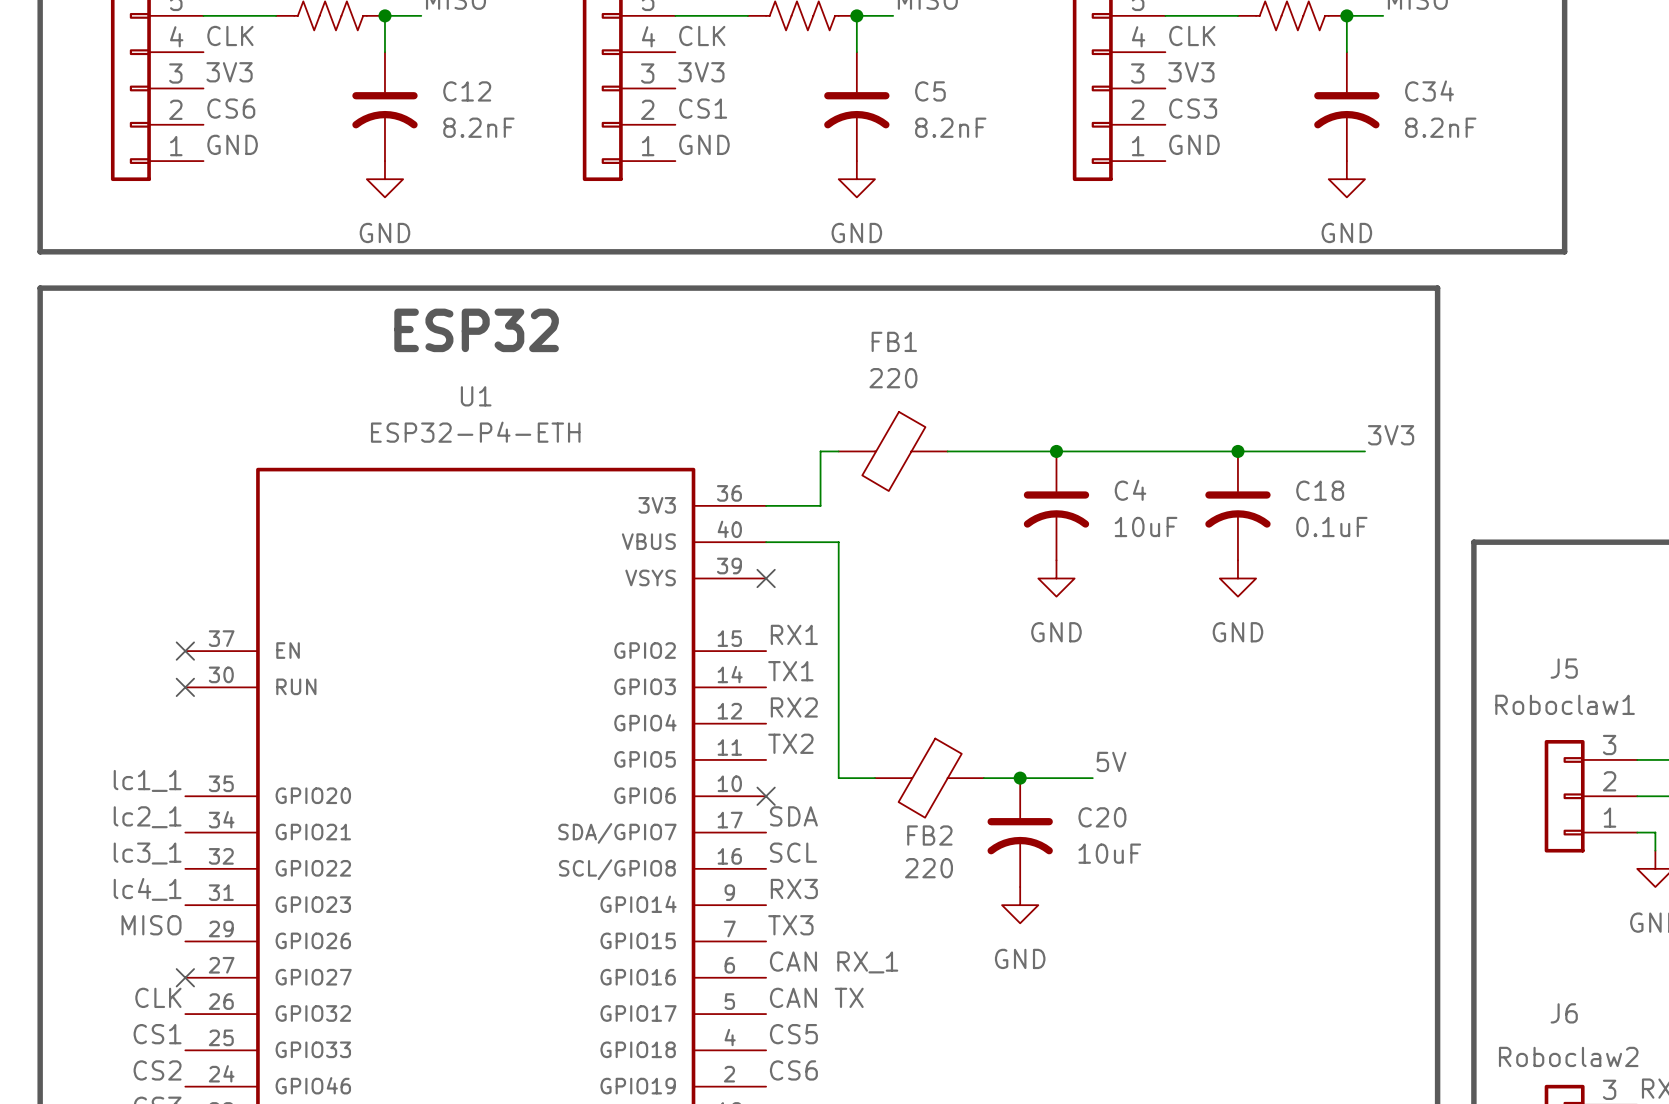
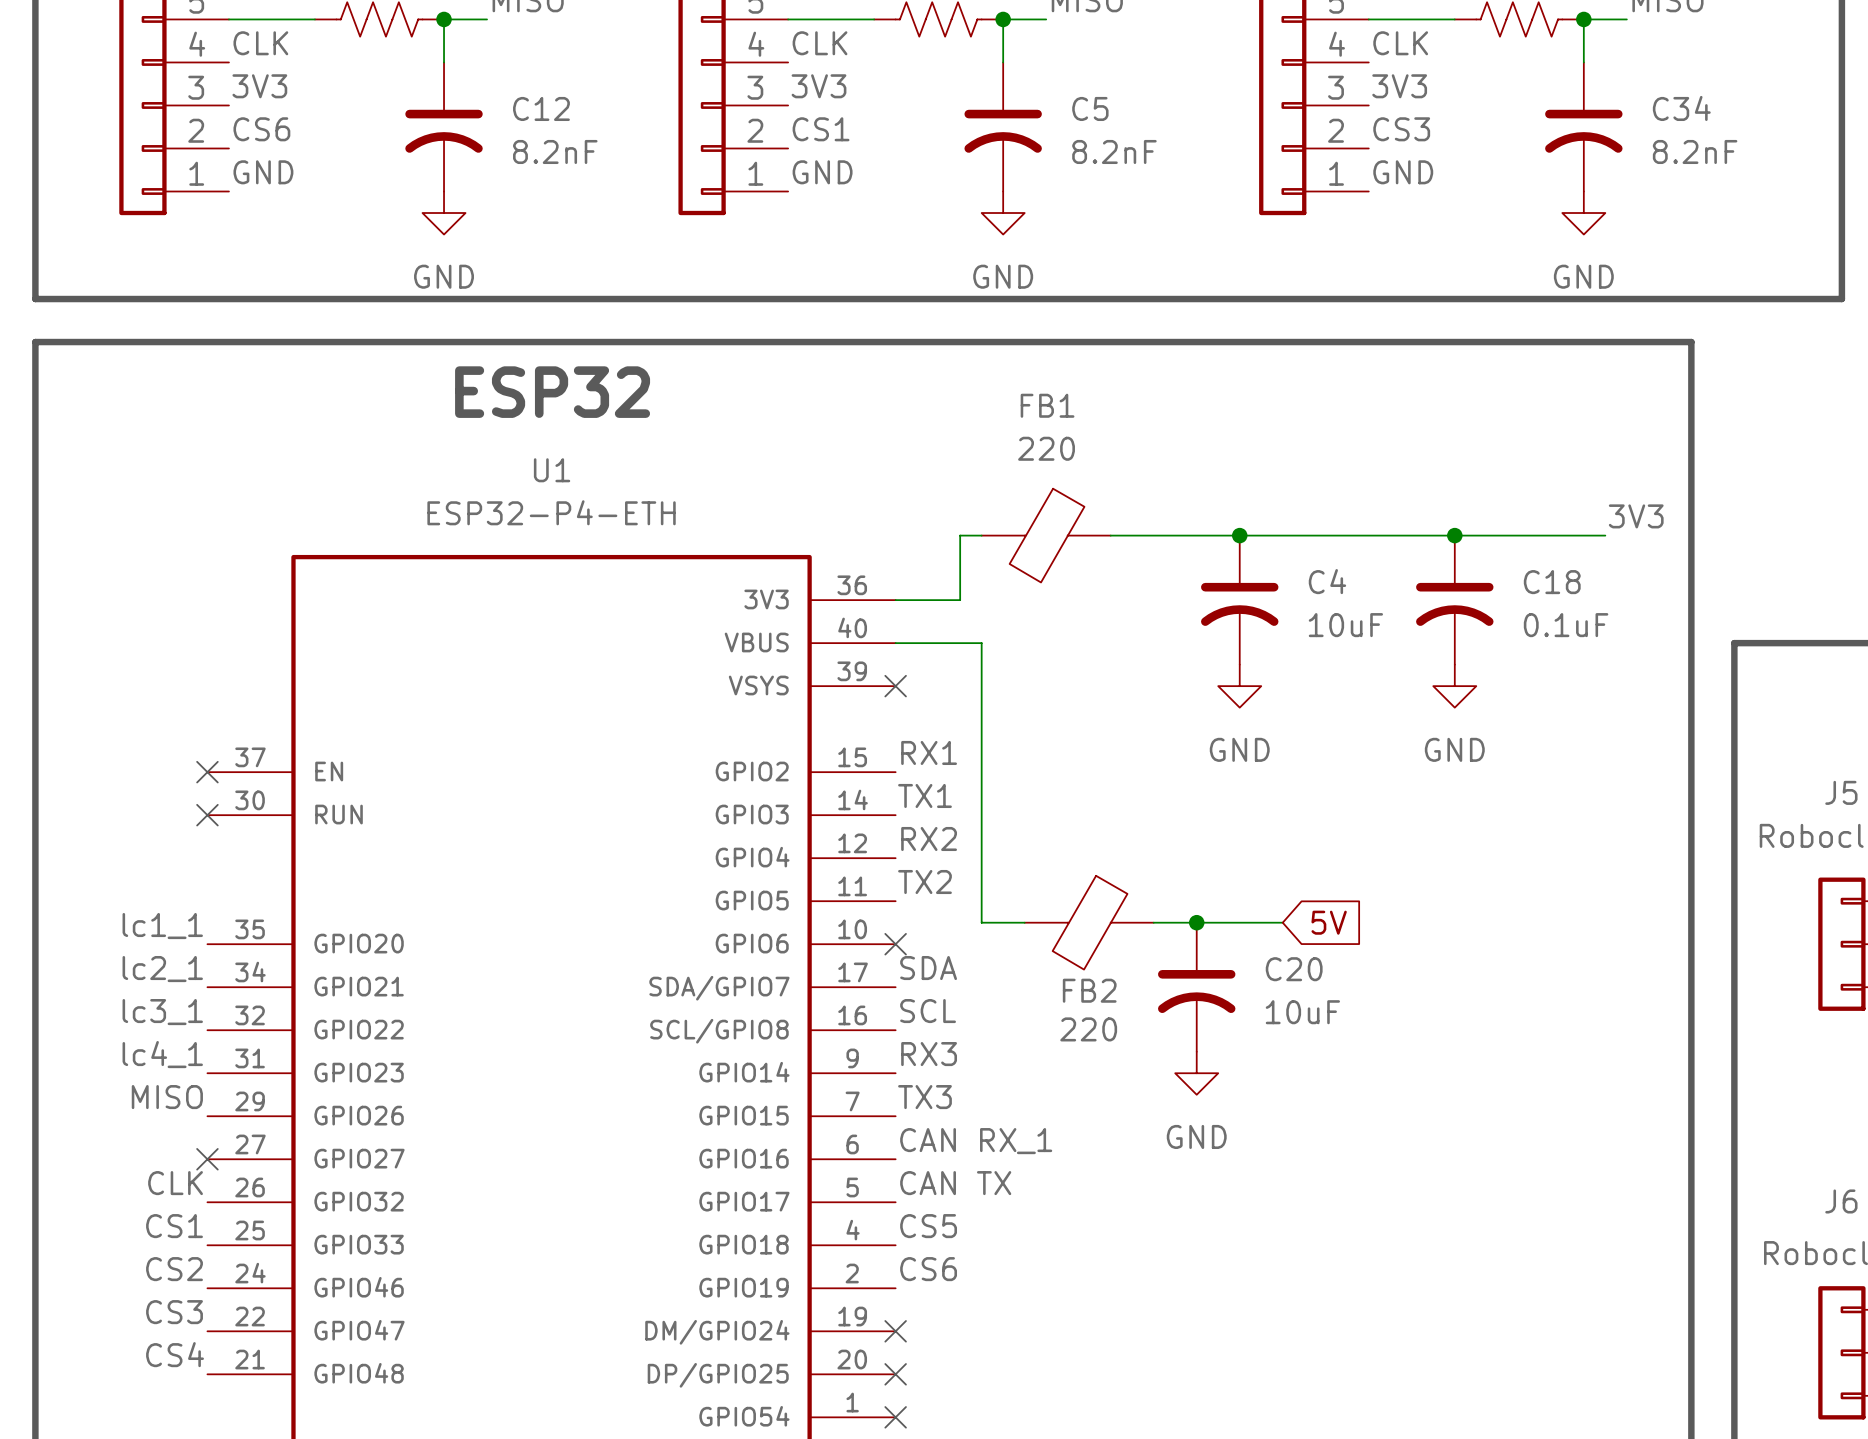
label: 5V (1111, 761) -> none
global label: none -> 5V (1329, 922)

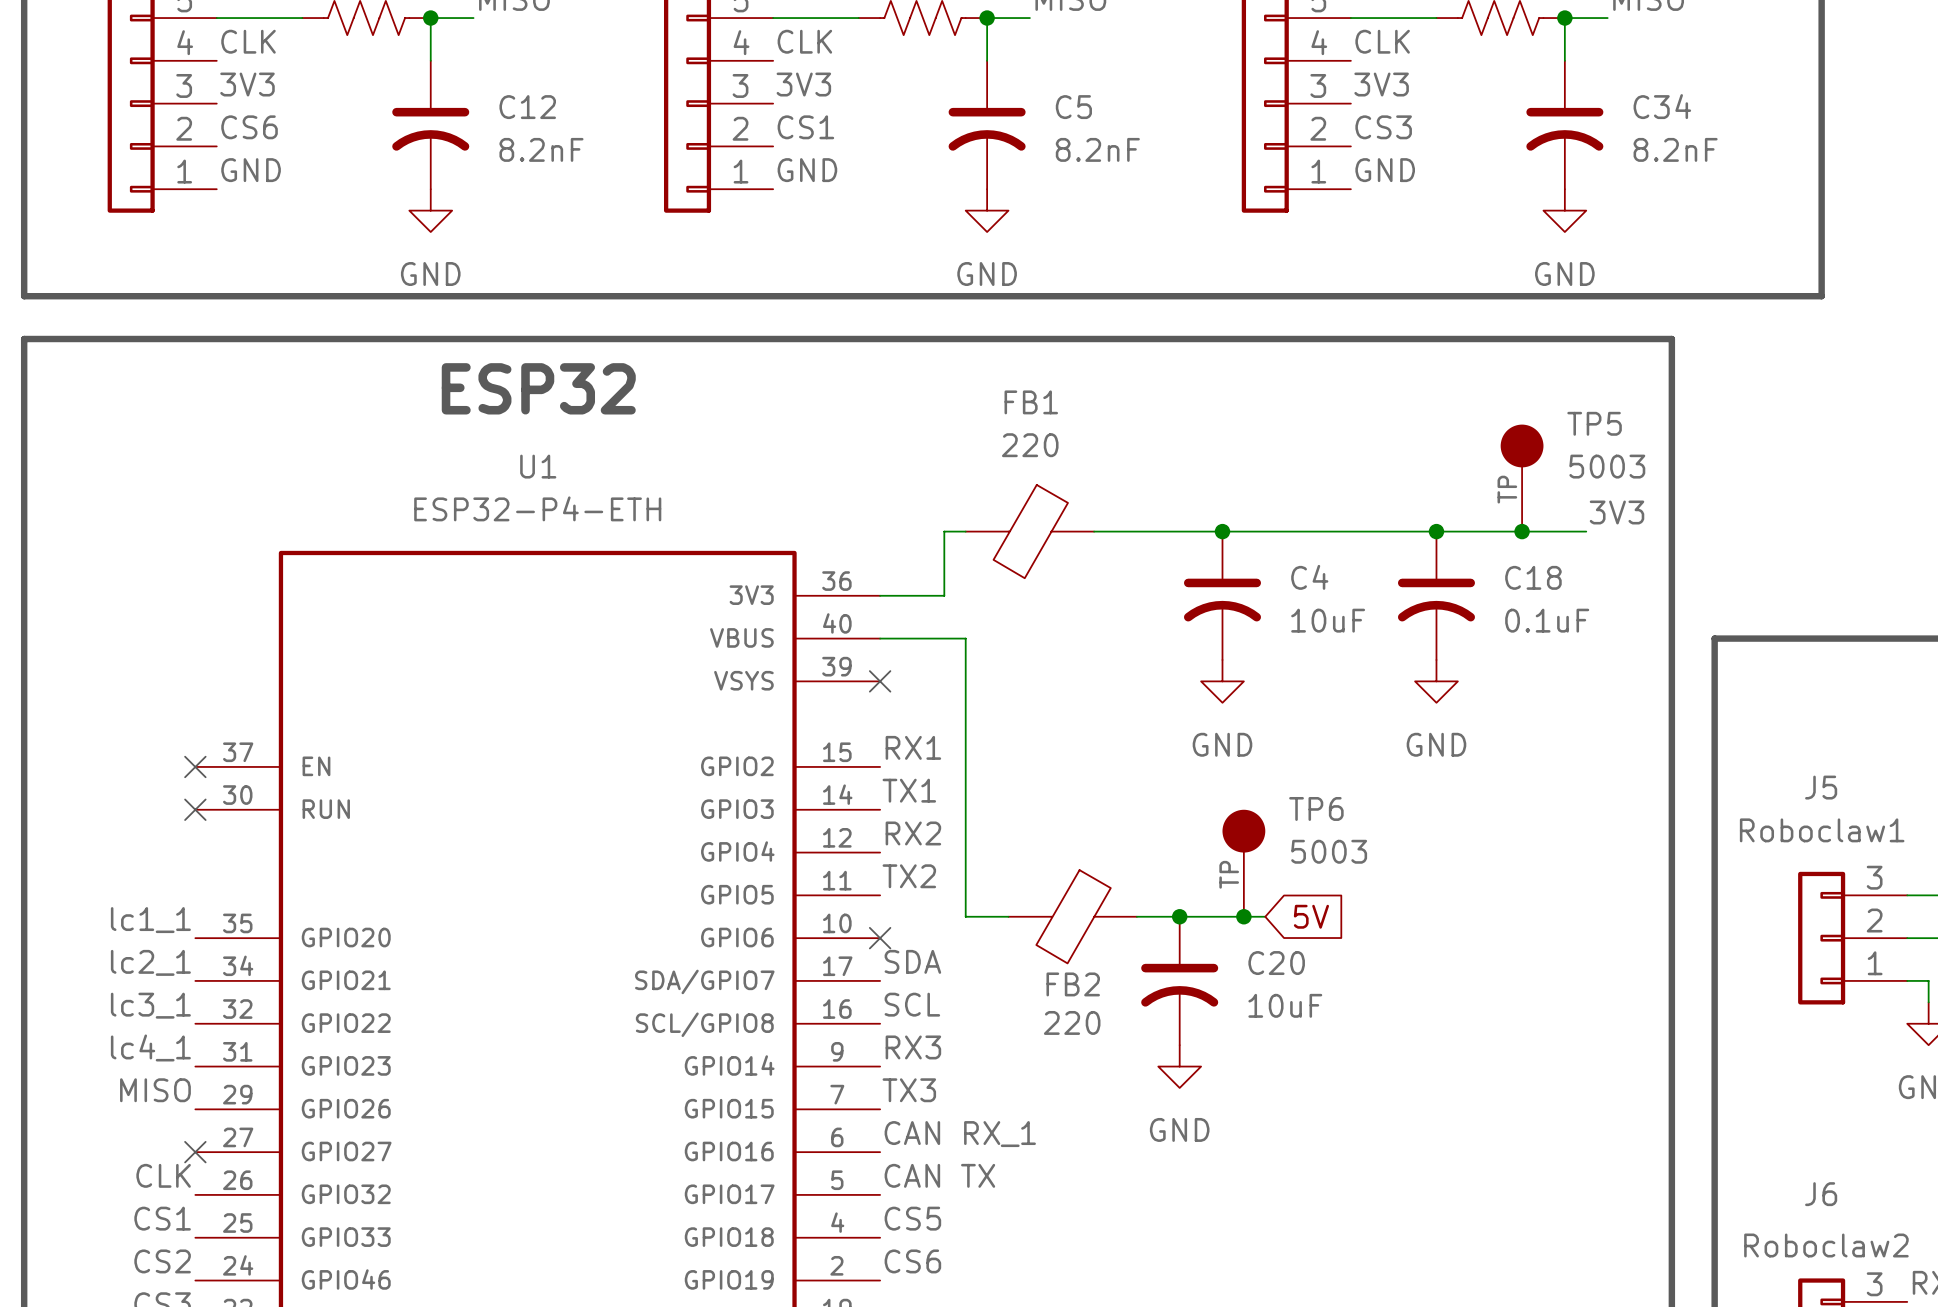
TP5: none -> 5003 (1522, 478)
junction: none -> (1522, 531)
TP6: none -> 5003 (1243, 863)
junction: none -> (1243, 916)

